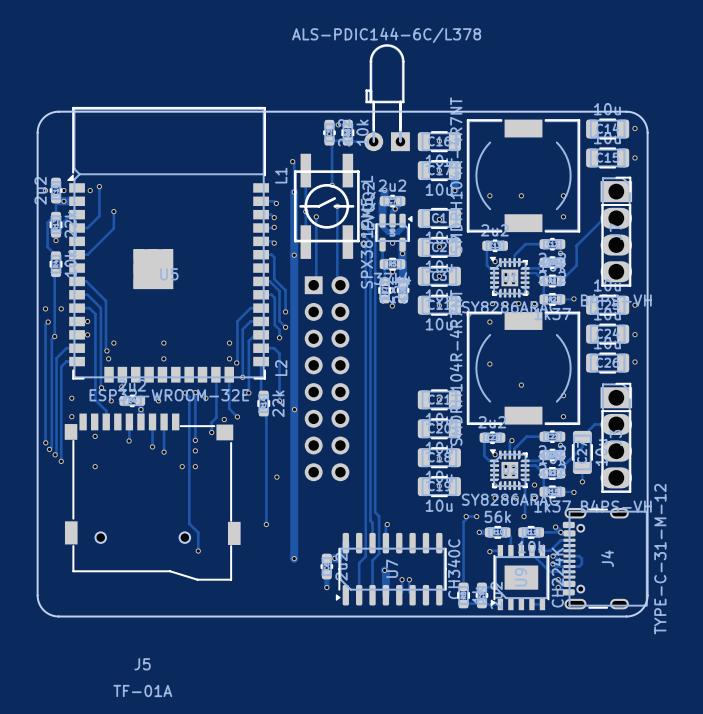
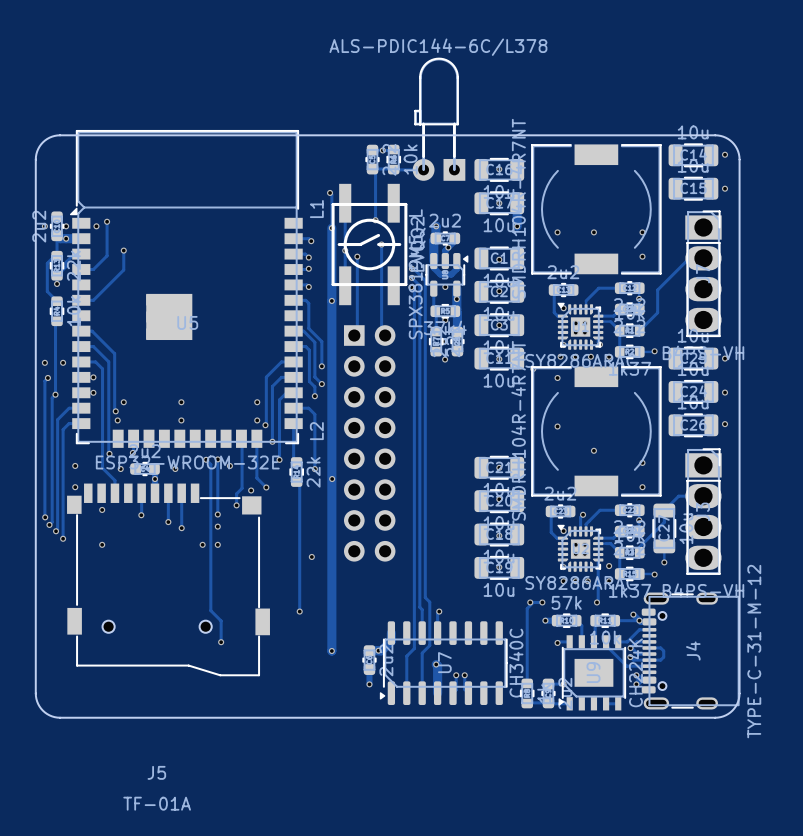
part value: 56k (497, 516) -> 57k (566, 602)

